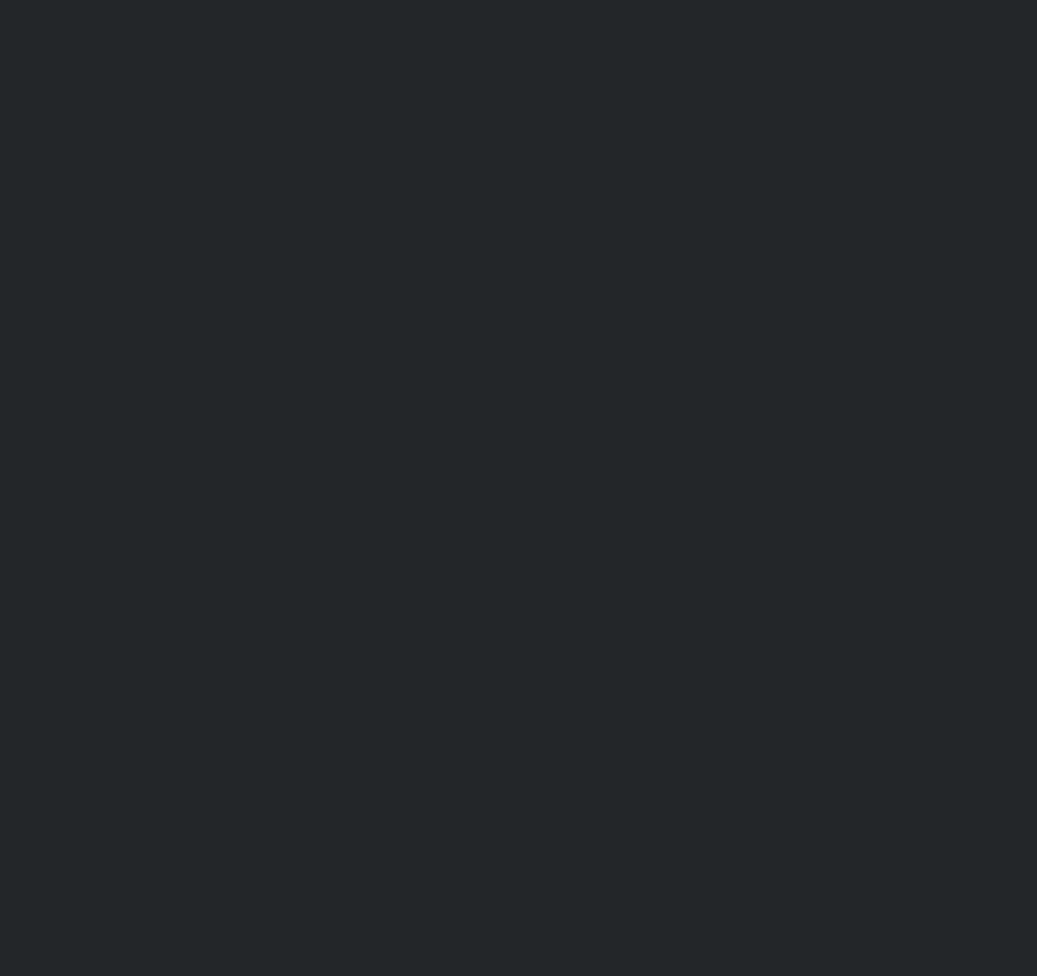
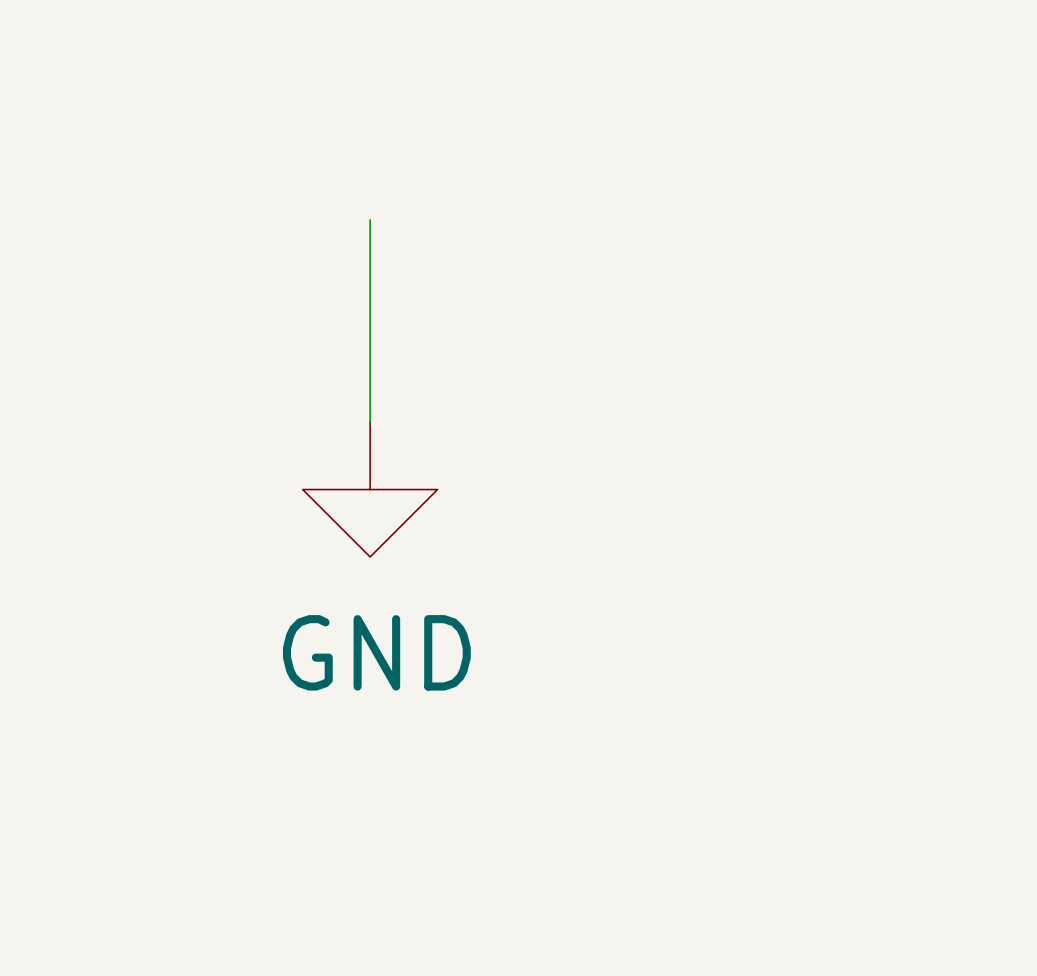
wire: none -> (370, 219) (370, 422)
power symbol: none -> GND (370, 489)

